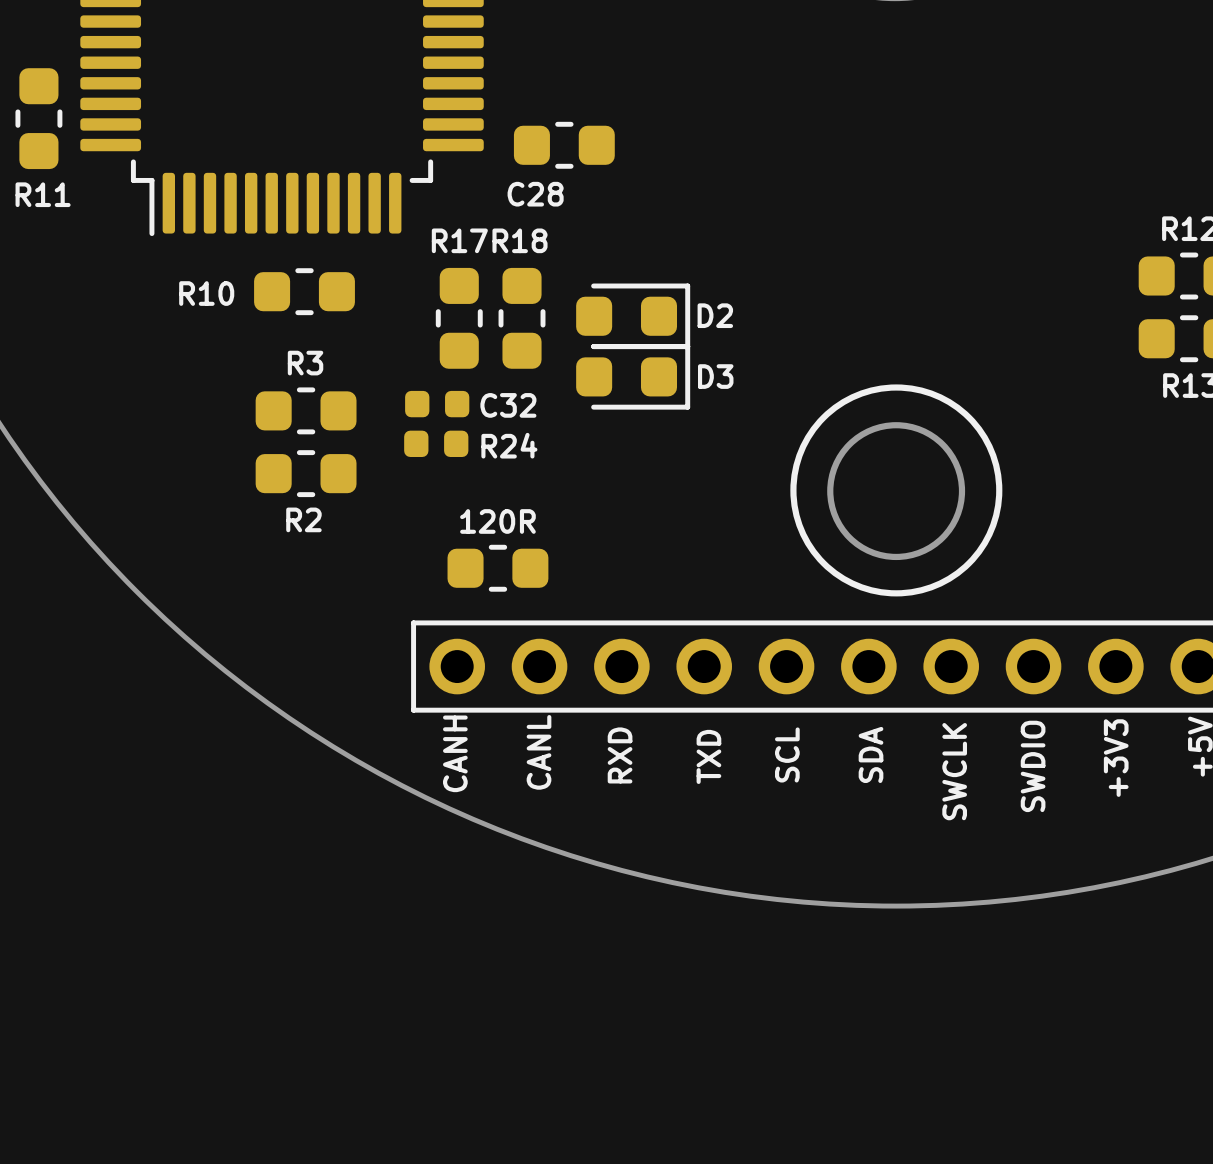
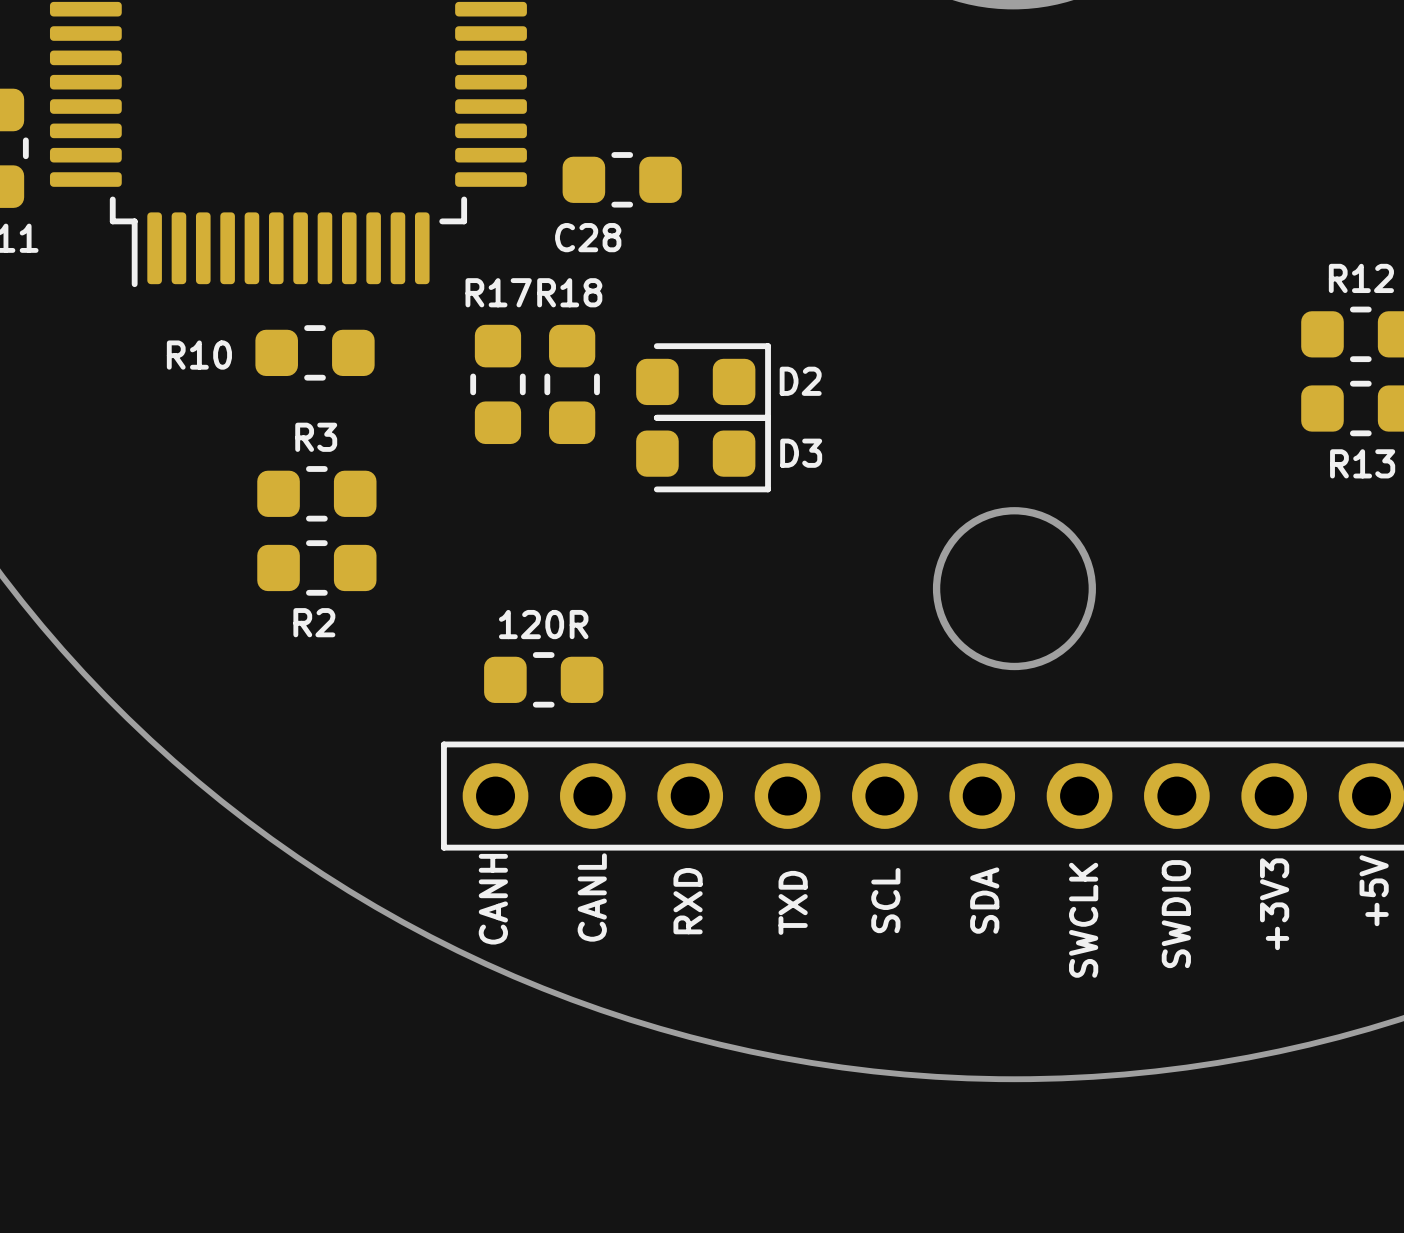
drawing: [790, 384, 1003, 597] -> none
C32: (437, 404) -> none
R24: (436, 443) -> none

